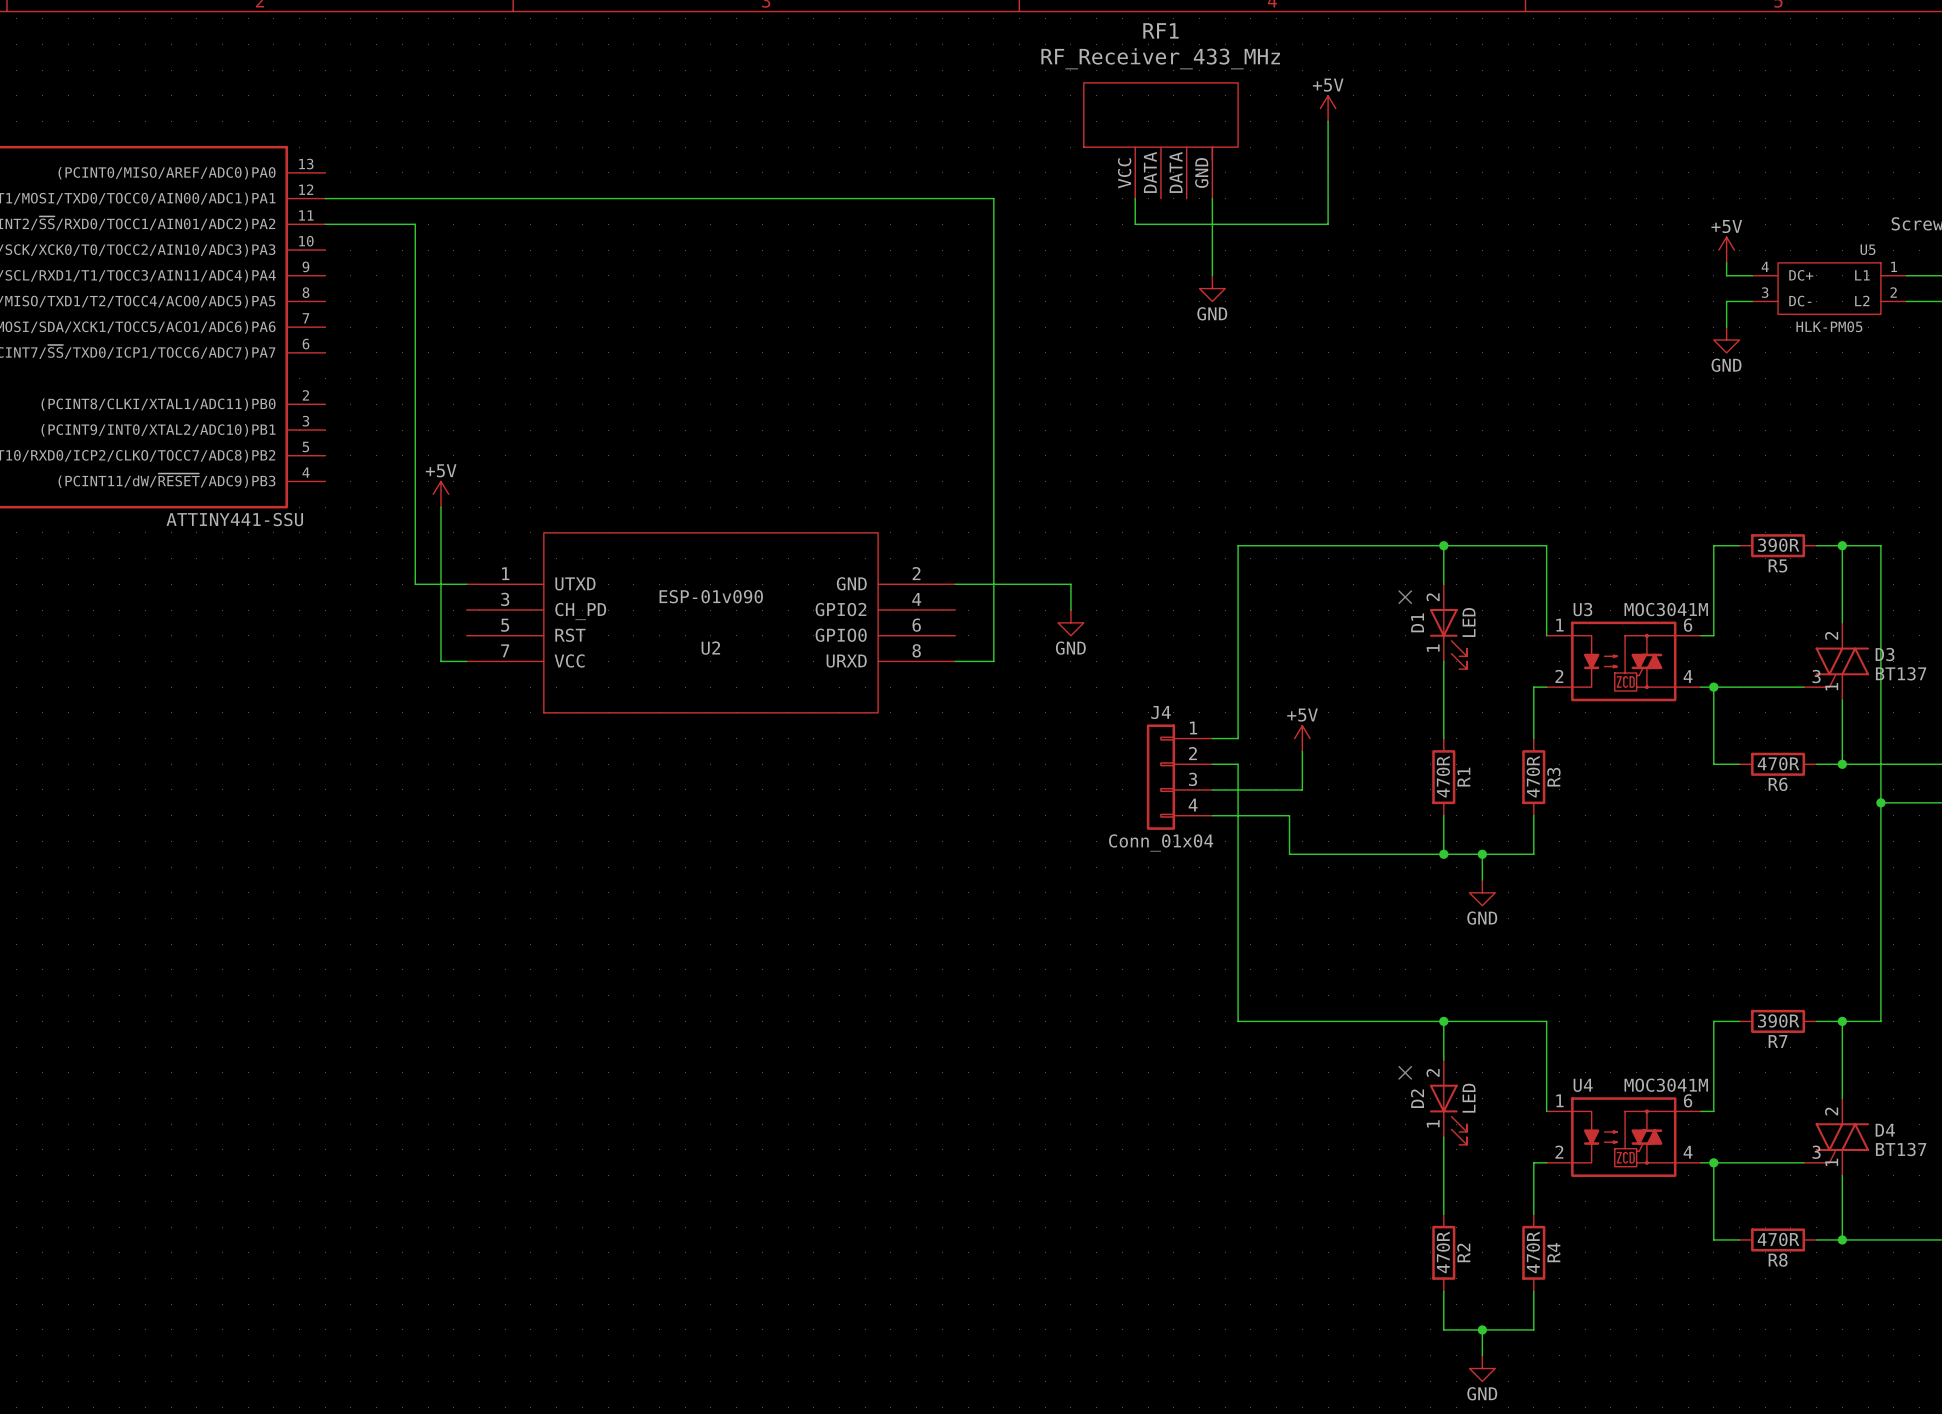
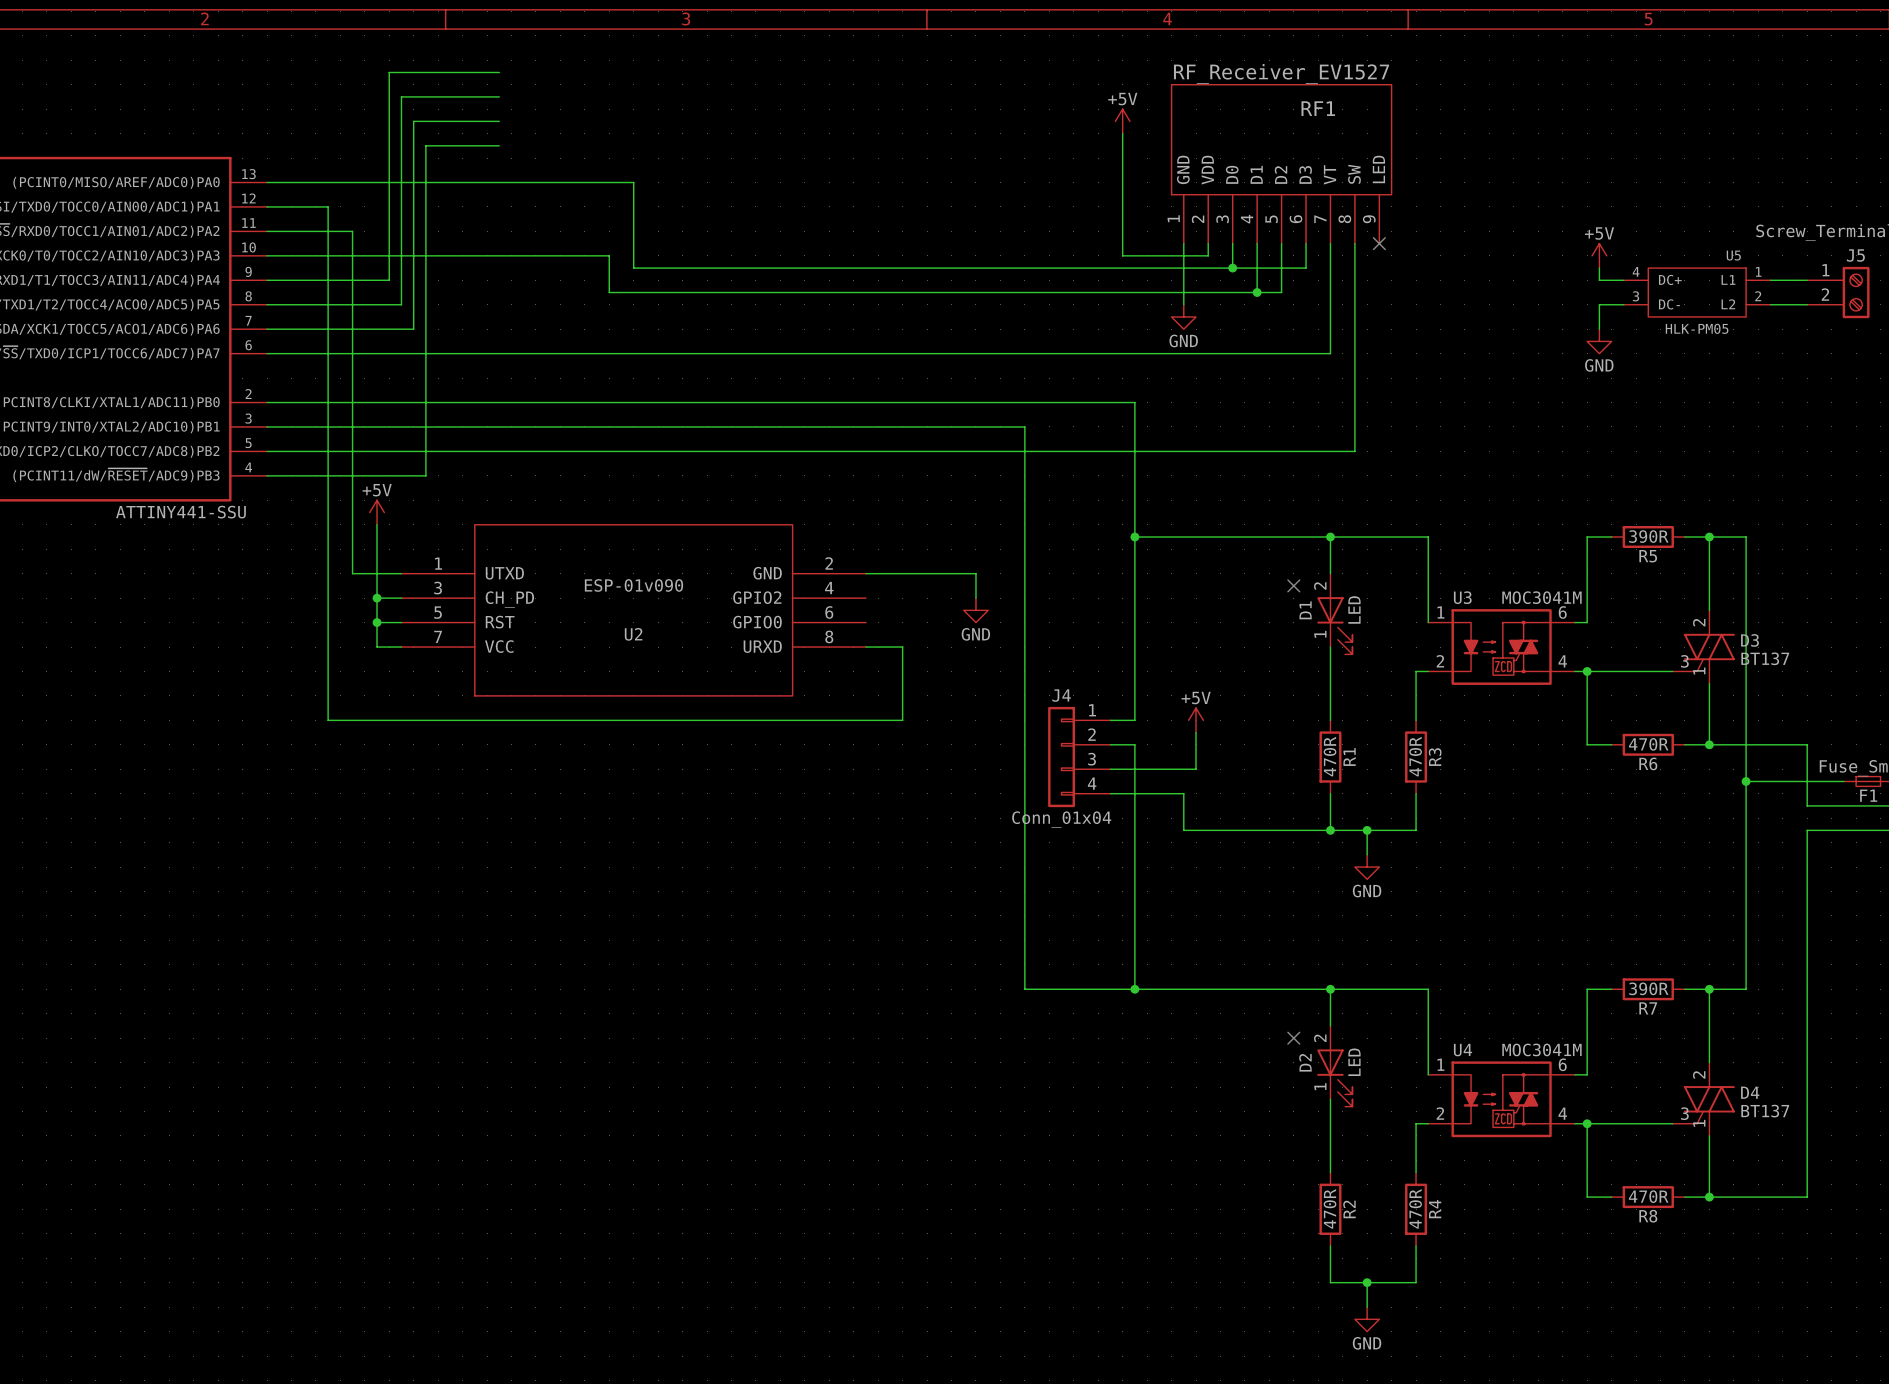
RF1 name position: RF1 (1160, 30) -> RF1 (1318, 108)
wire: none -> (499, 72) (389, 72) (389, 280) (267, 280)
RF1 value: RF_Receiver_433_MHz (1160, 58) -> RF_Receiver_EV1527 (1281, 74)
wire: none -> (499, 96) (401, 96) (401, 304) (267, 304)
RF1 symbol: [1083, 82, 1239, 199] -> [1171, 84, 1392, 244]
wire: none -> (499, 121) (413, 121) (413, 329) (267, 329)
power symbol position: +5V (1328, 108) -> +5V (1122, 121)
wire: none -> (1122, 133) (1122, 255) (1208, 255) (1208, 243)
wire: (1328, 121) (1328, 224) (1135, 224) (1135, 198) -> none
wire: none -> (499, 145) (425, 145) (425, 475) (267, 475)
wire: none -> (267, 182) (633, 182) (633, 268) (1306, 268) (1306, 243)
wire: (389, 198) (993, 198) (993, 661) -> (328, 206) (328, 720) (902, 720) (902, 647)
wire: (1212, 198) (1212, 275) -> none
wire: none -> (1183, 243) (1183, 304)
wire: none -> (1232, 243) (1232, 268)
wire: none -> (1257, 243) (1257, 292)
wire: none -> (1281, 243) (1281, 292) (609, 292) (609, 255) (267, 255)
wire: none -> (1330, 243) (1330, 353) (267, 353)
wire: none -> (1354, 243) (1354, 451) (267, 451)
no-connect mark: none -> (1379, 243)
junction: none -> (1232, 268)
power symbol position: GND (1212, 288) -> GND (1183, 316)
junction: none -> (1257, 292)
wire: none -> (267, 402) (1134, 402) (1134, 537)
wire: none -> (267, 426) (1024, 426) (1024, 989) (1134, 989)
power symbol position: +5V (440, 494) -> +5V (377, 512)
junction: none -> (1134, 537)
wire: none -> (377, 598) (401, 598)
junction: none -> (377, 598)
wire: none -> (377, 622) (401, 622)
junction: none -> (377, 622)
junction: none -> (1134, 989)

